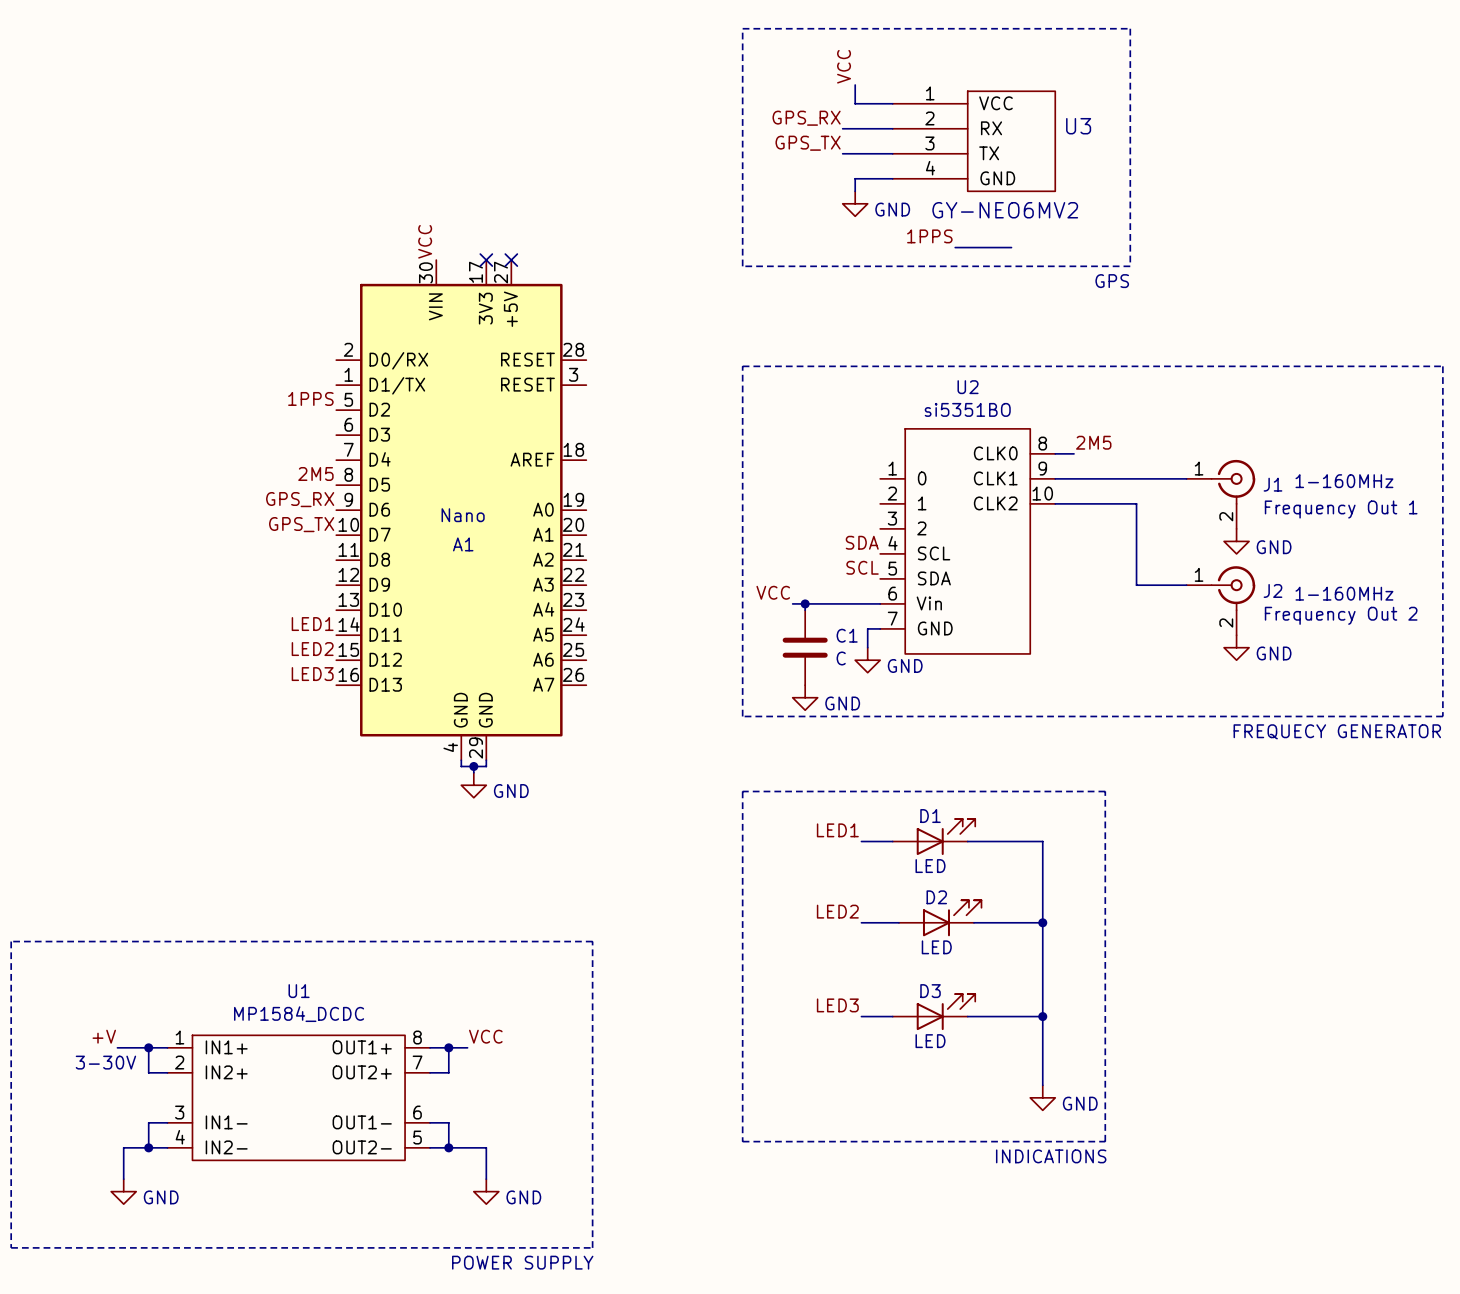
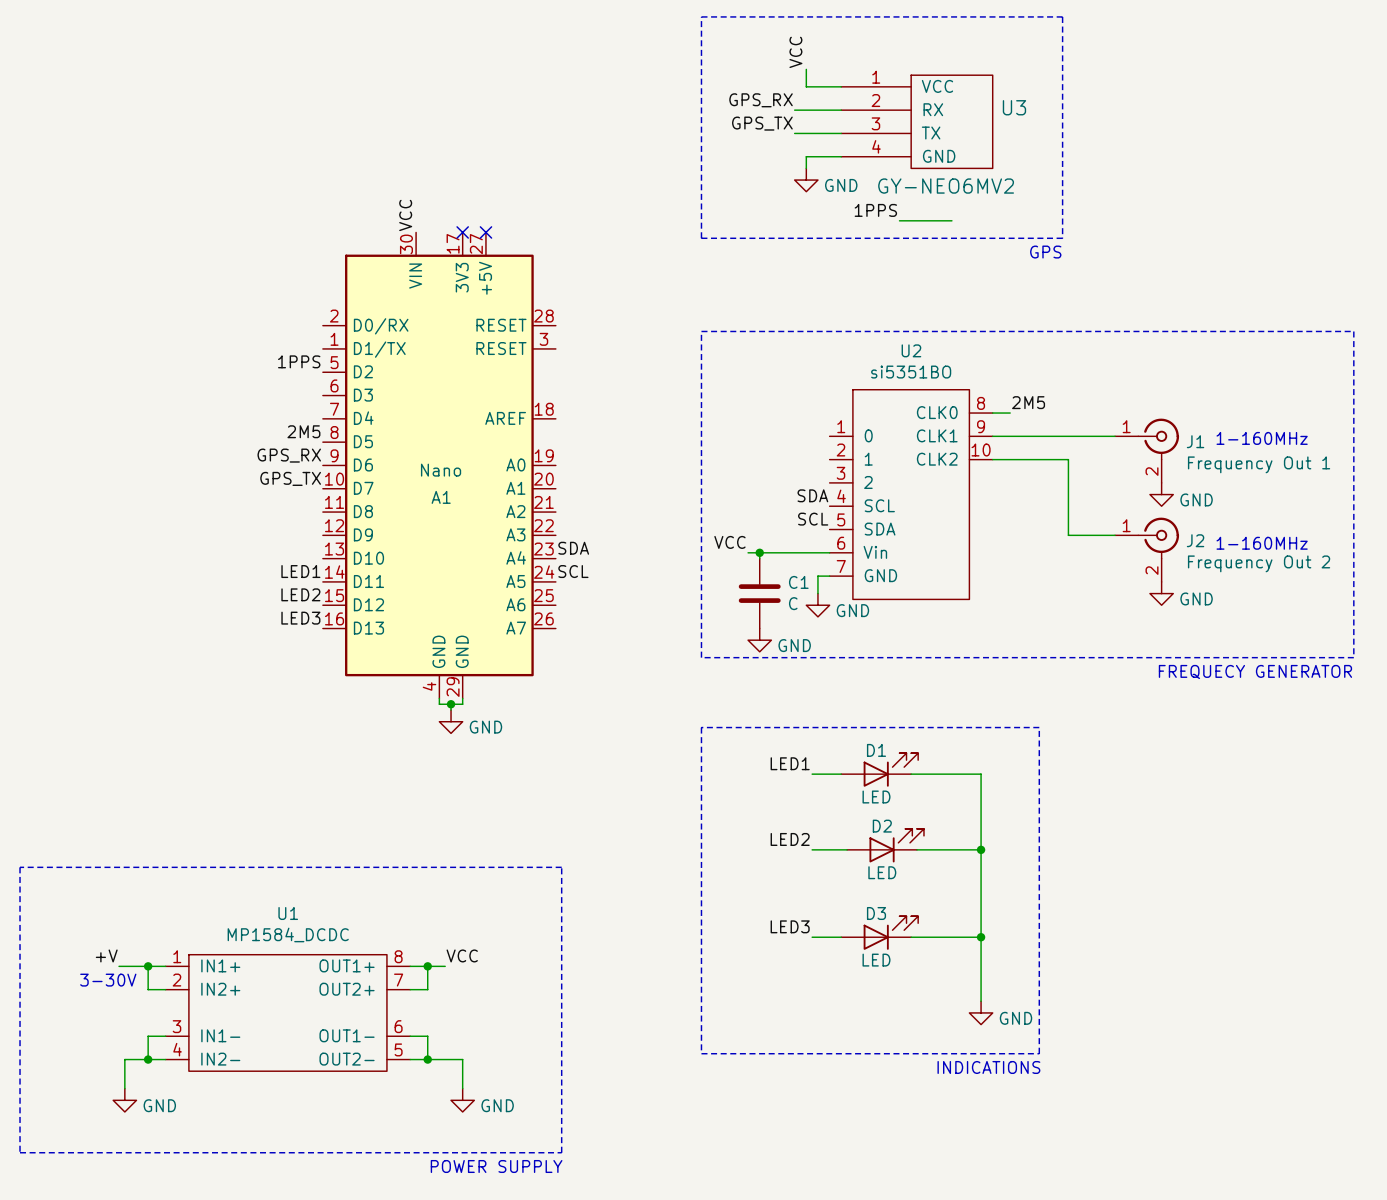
label: none -> SDA (573, 548)
label: none -> SCL (573, 571)

